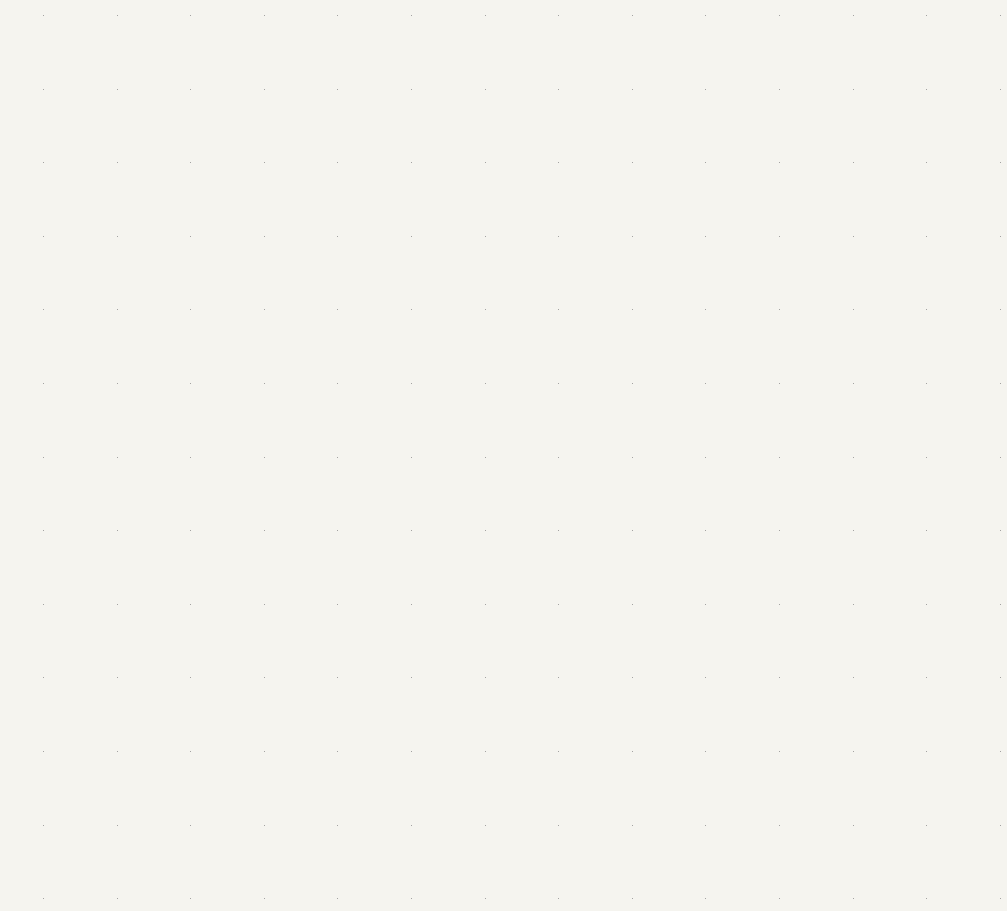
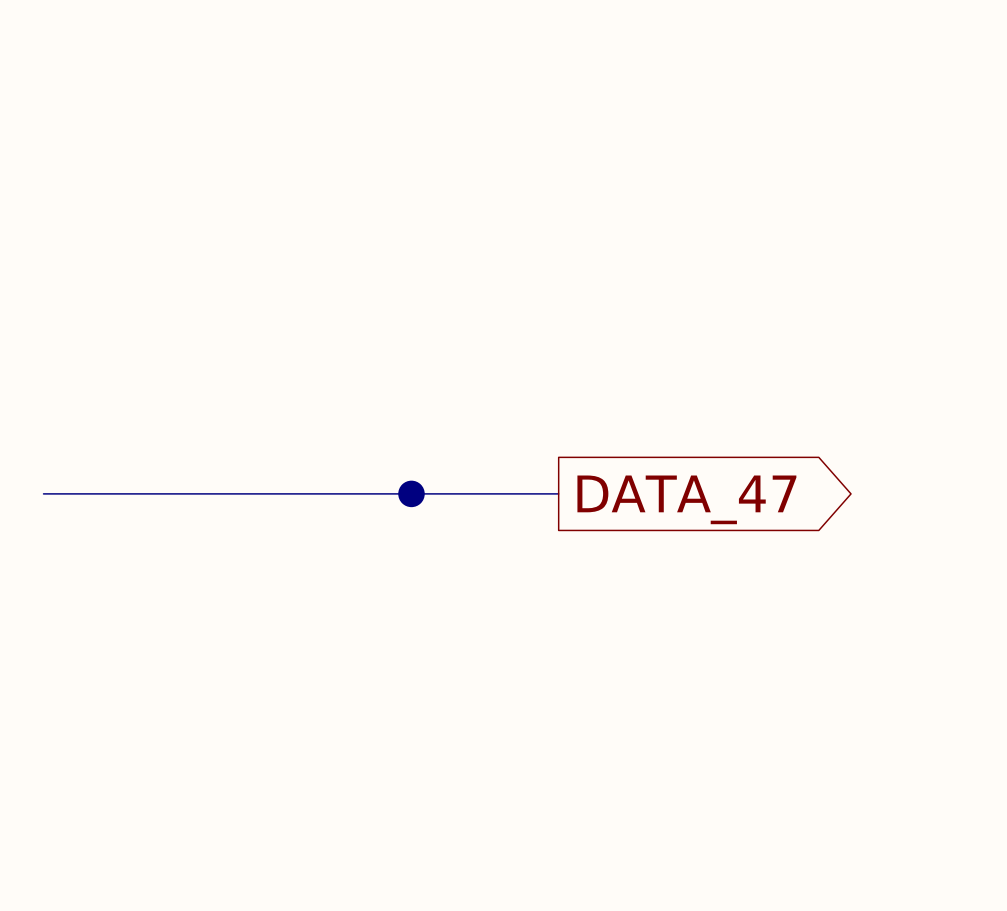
wire: none -> (43, 493) (558, 493)
junction: none -> (411, 493)
global label: none -> DATA_47 (686, 499)

